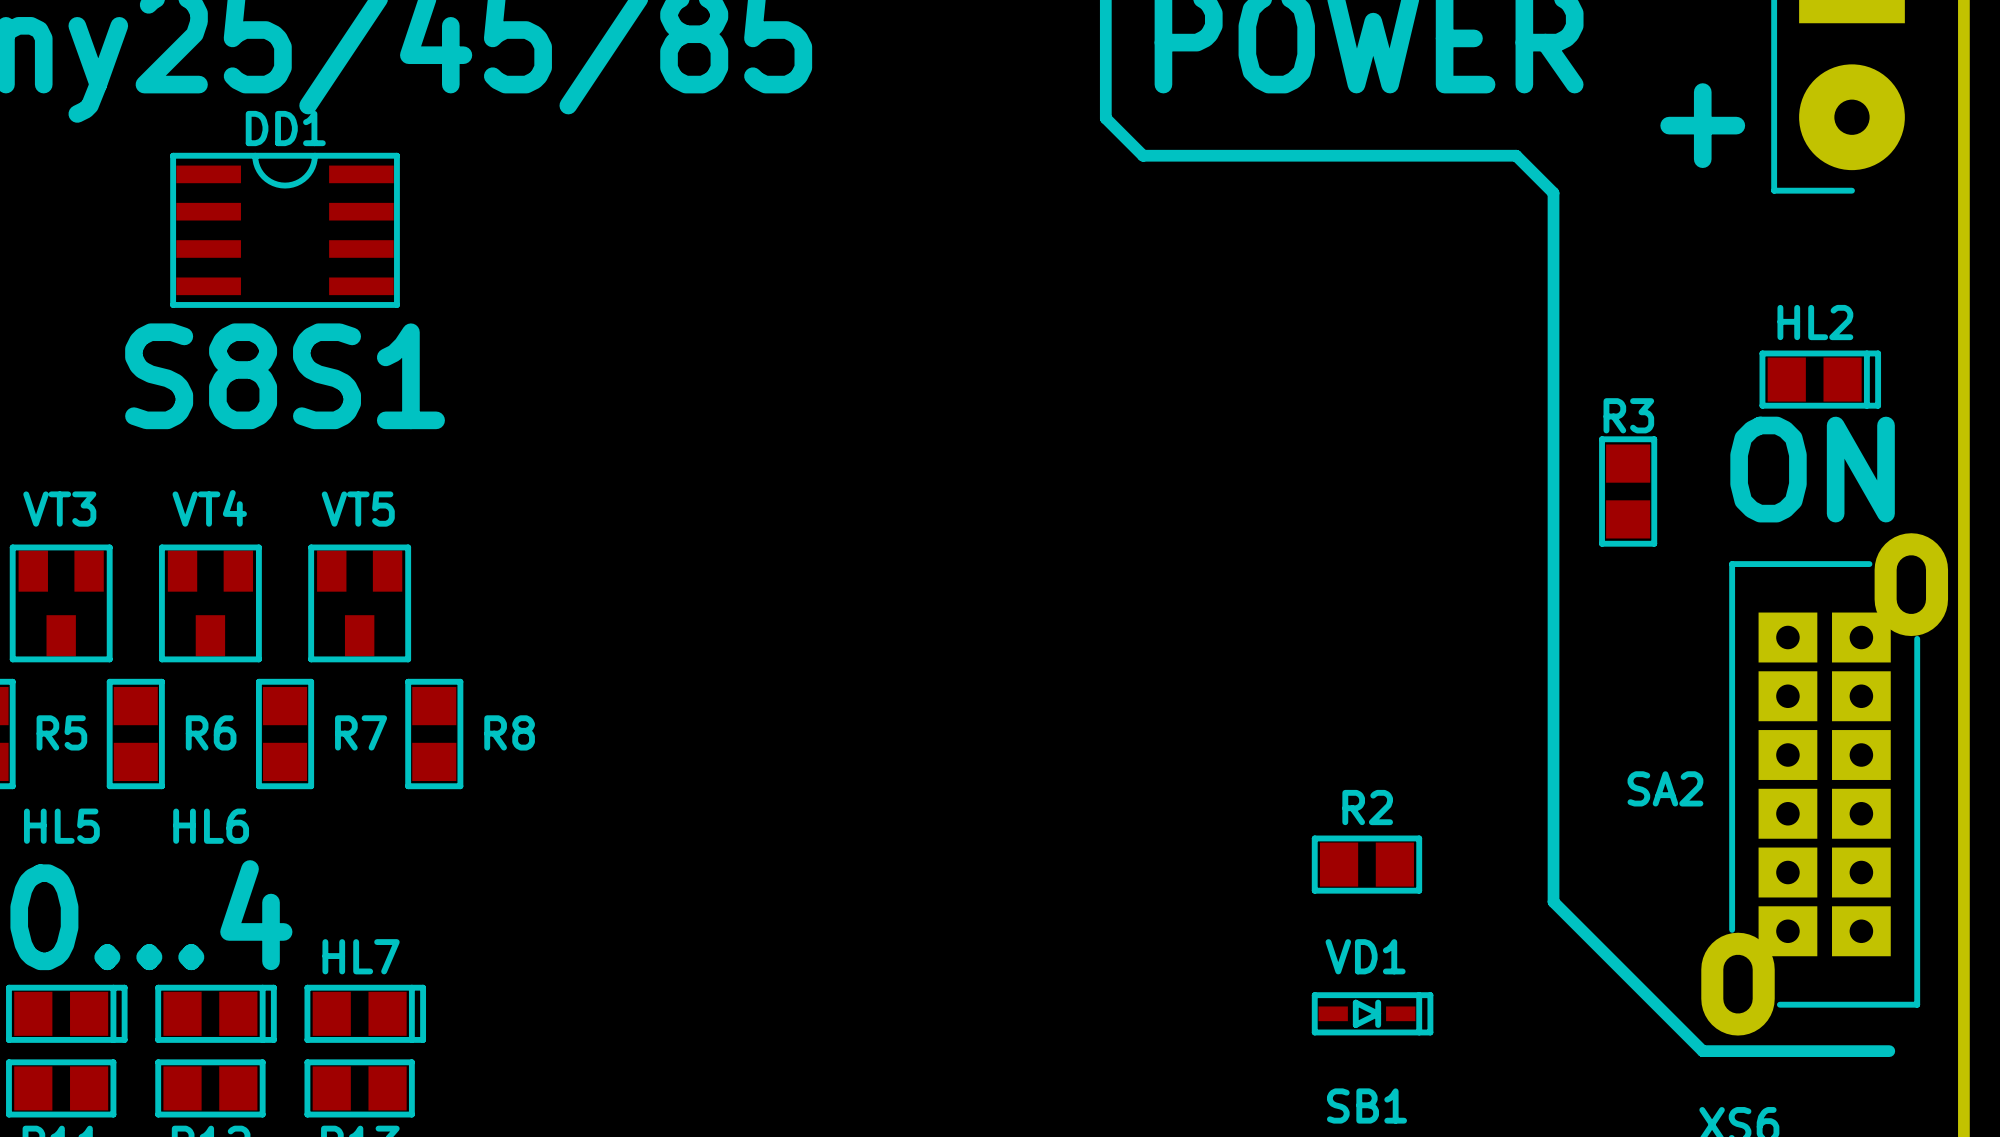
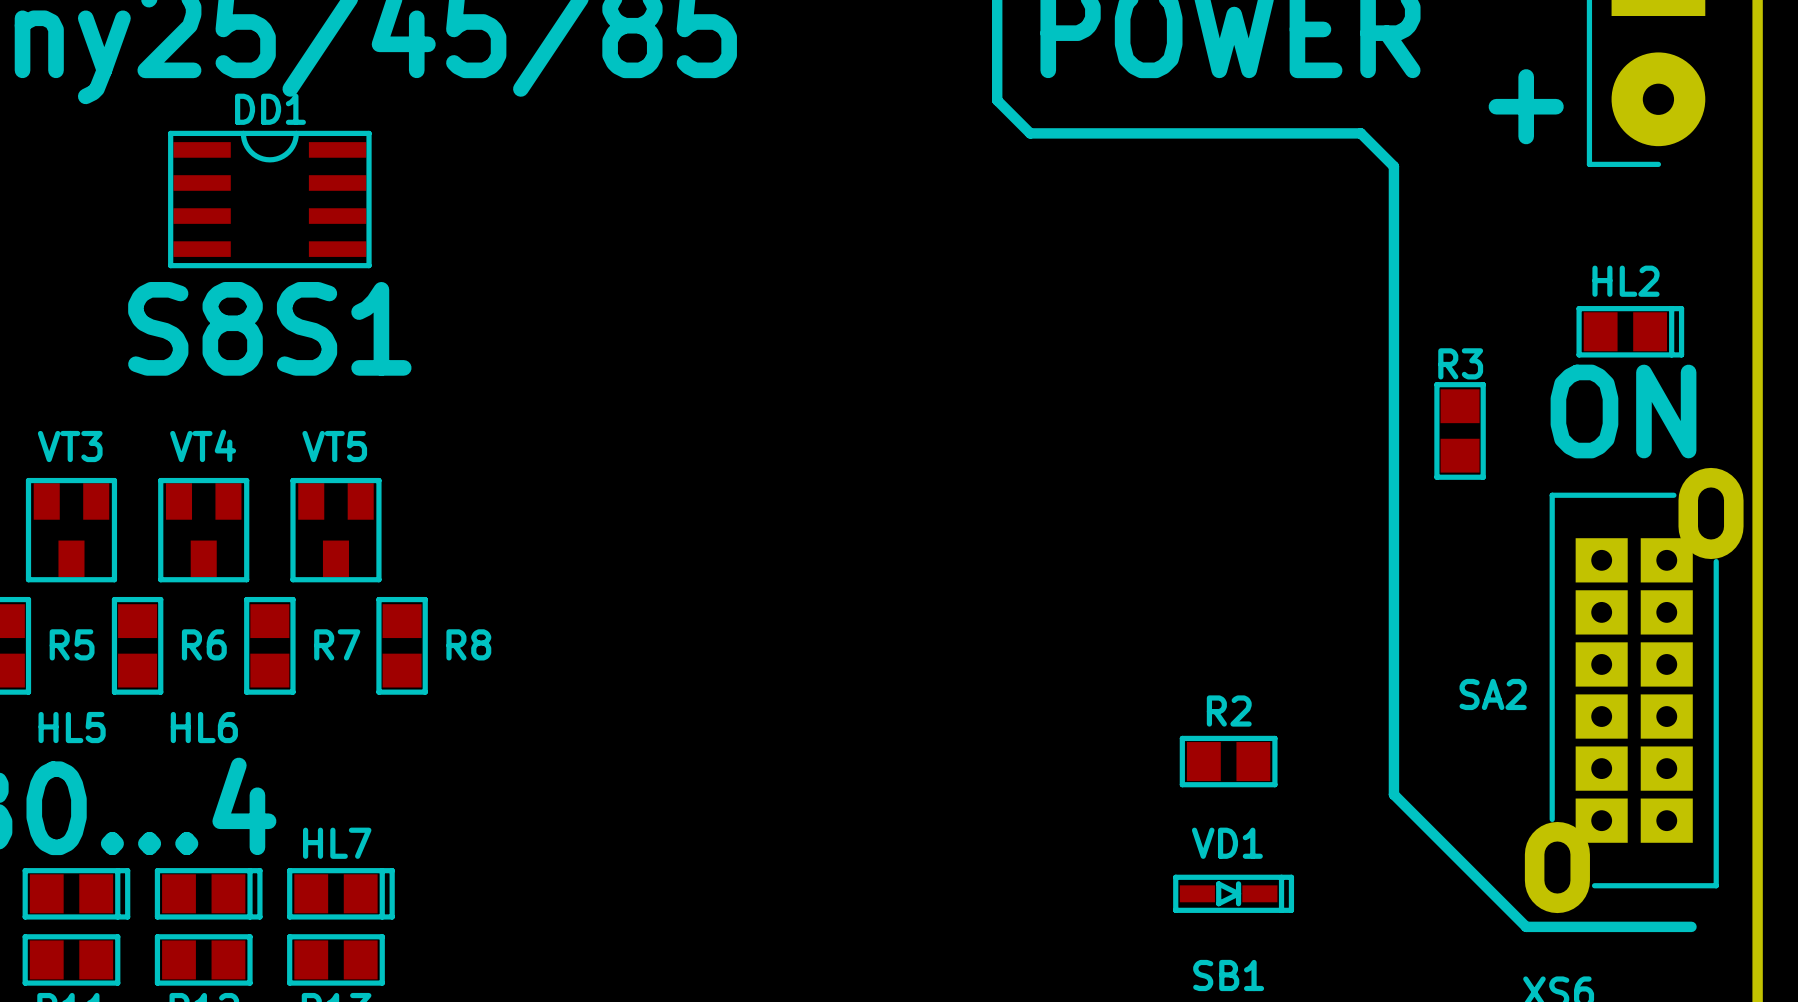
VD1 footprint: [1311, 992, 1434, 1036] -> [1173, 874, 1295, 913]

